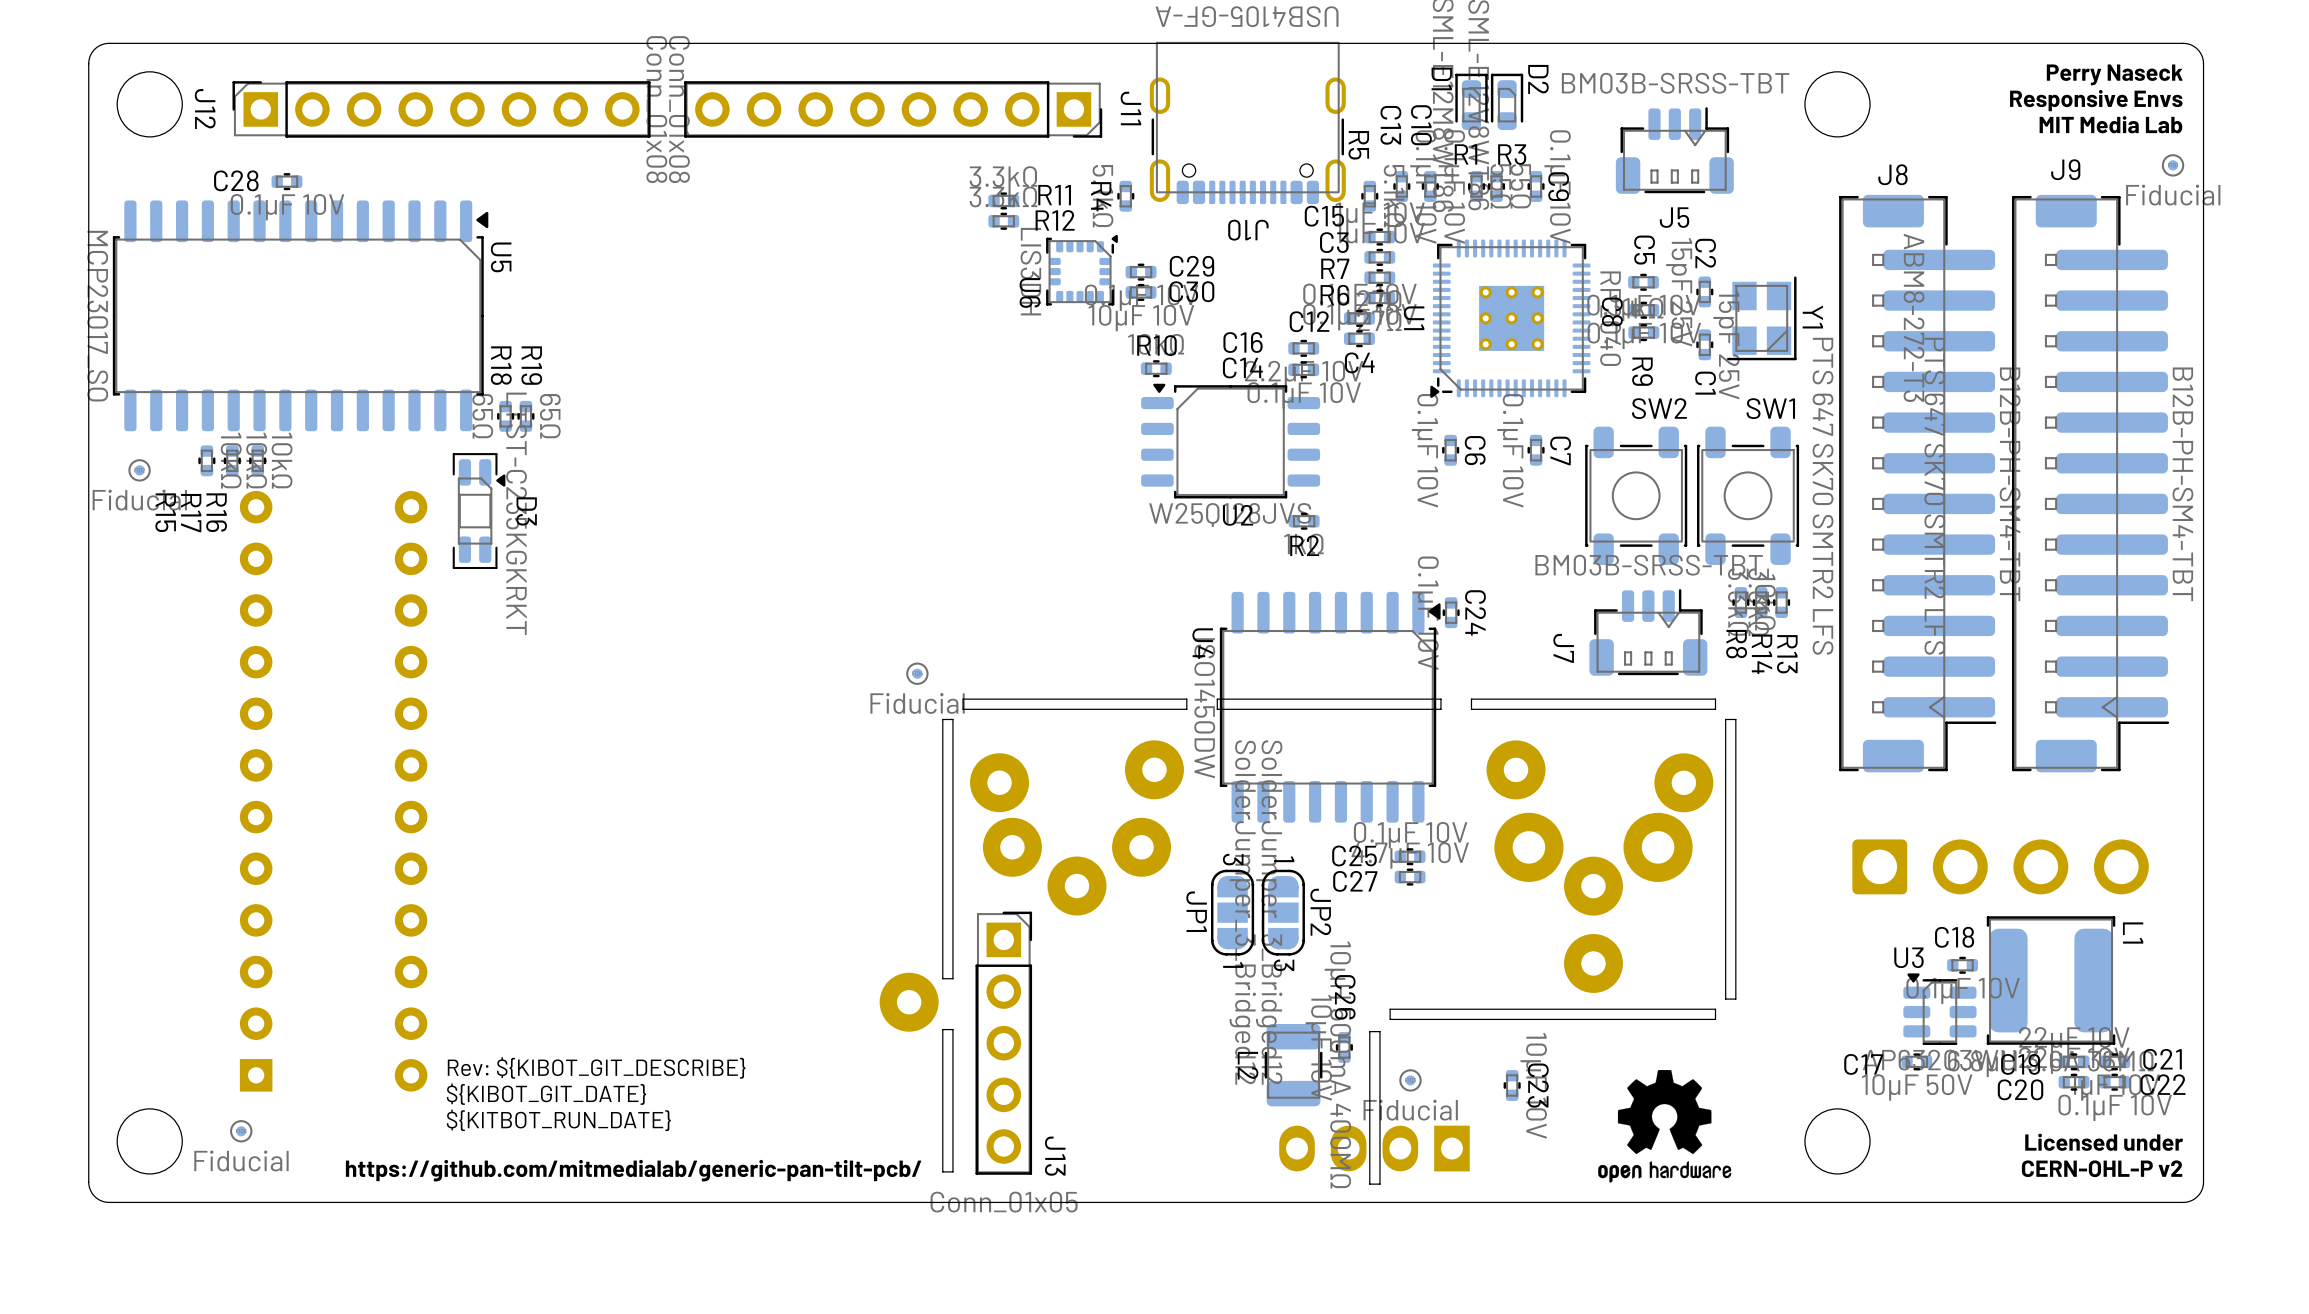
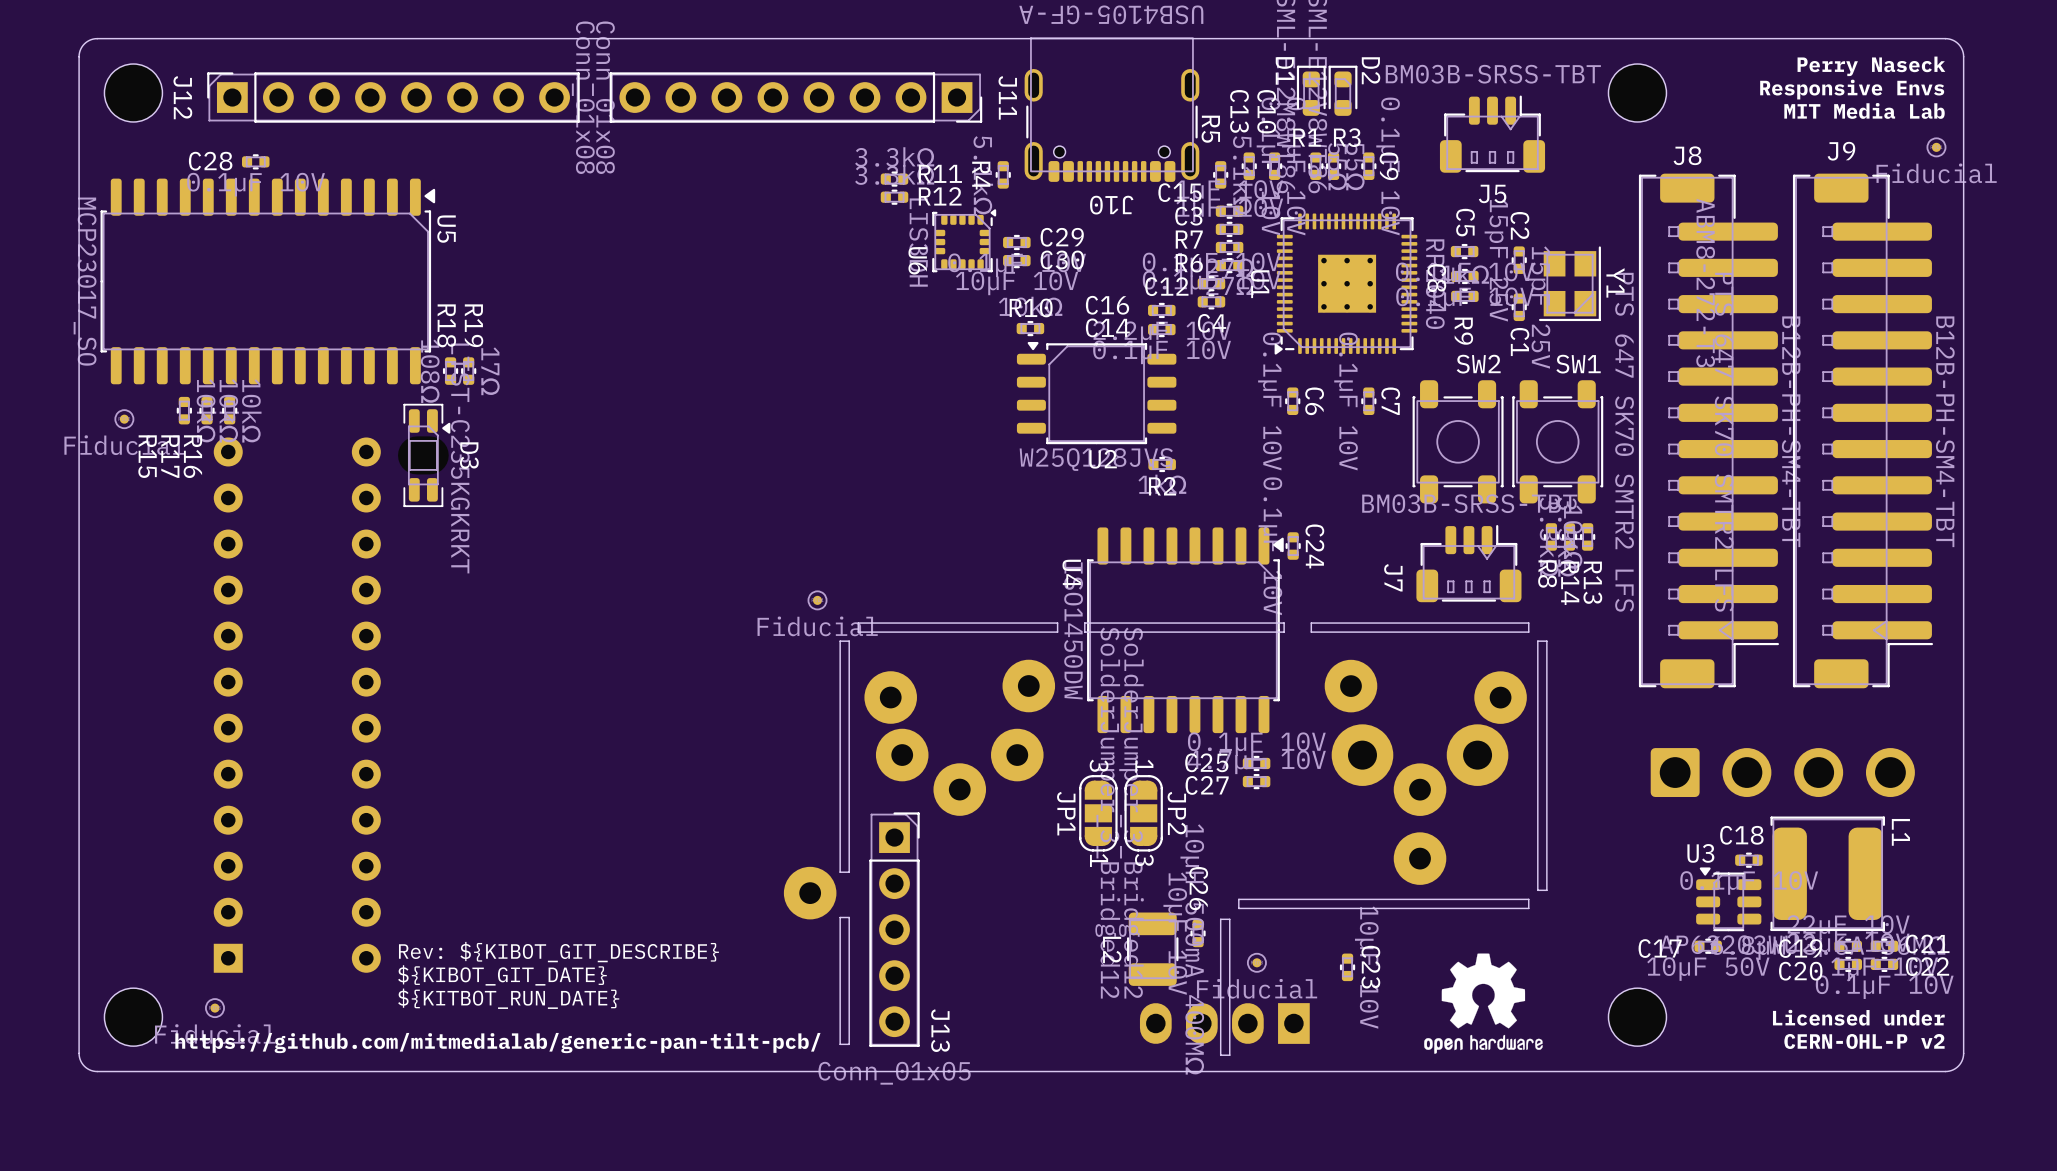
R18 value: 65Ω (482, 416) -> 108Ω (430, 371)
R19 value: 65Ω (550, 416) -> 17Ω (490, 371)

